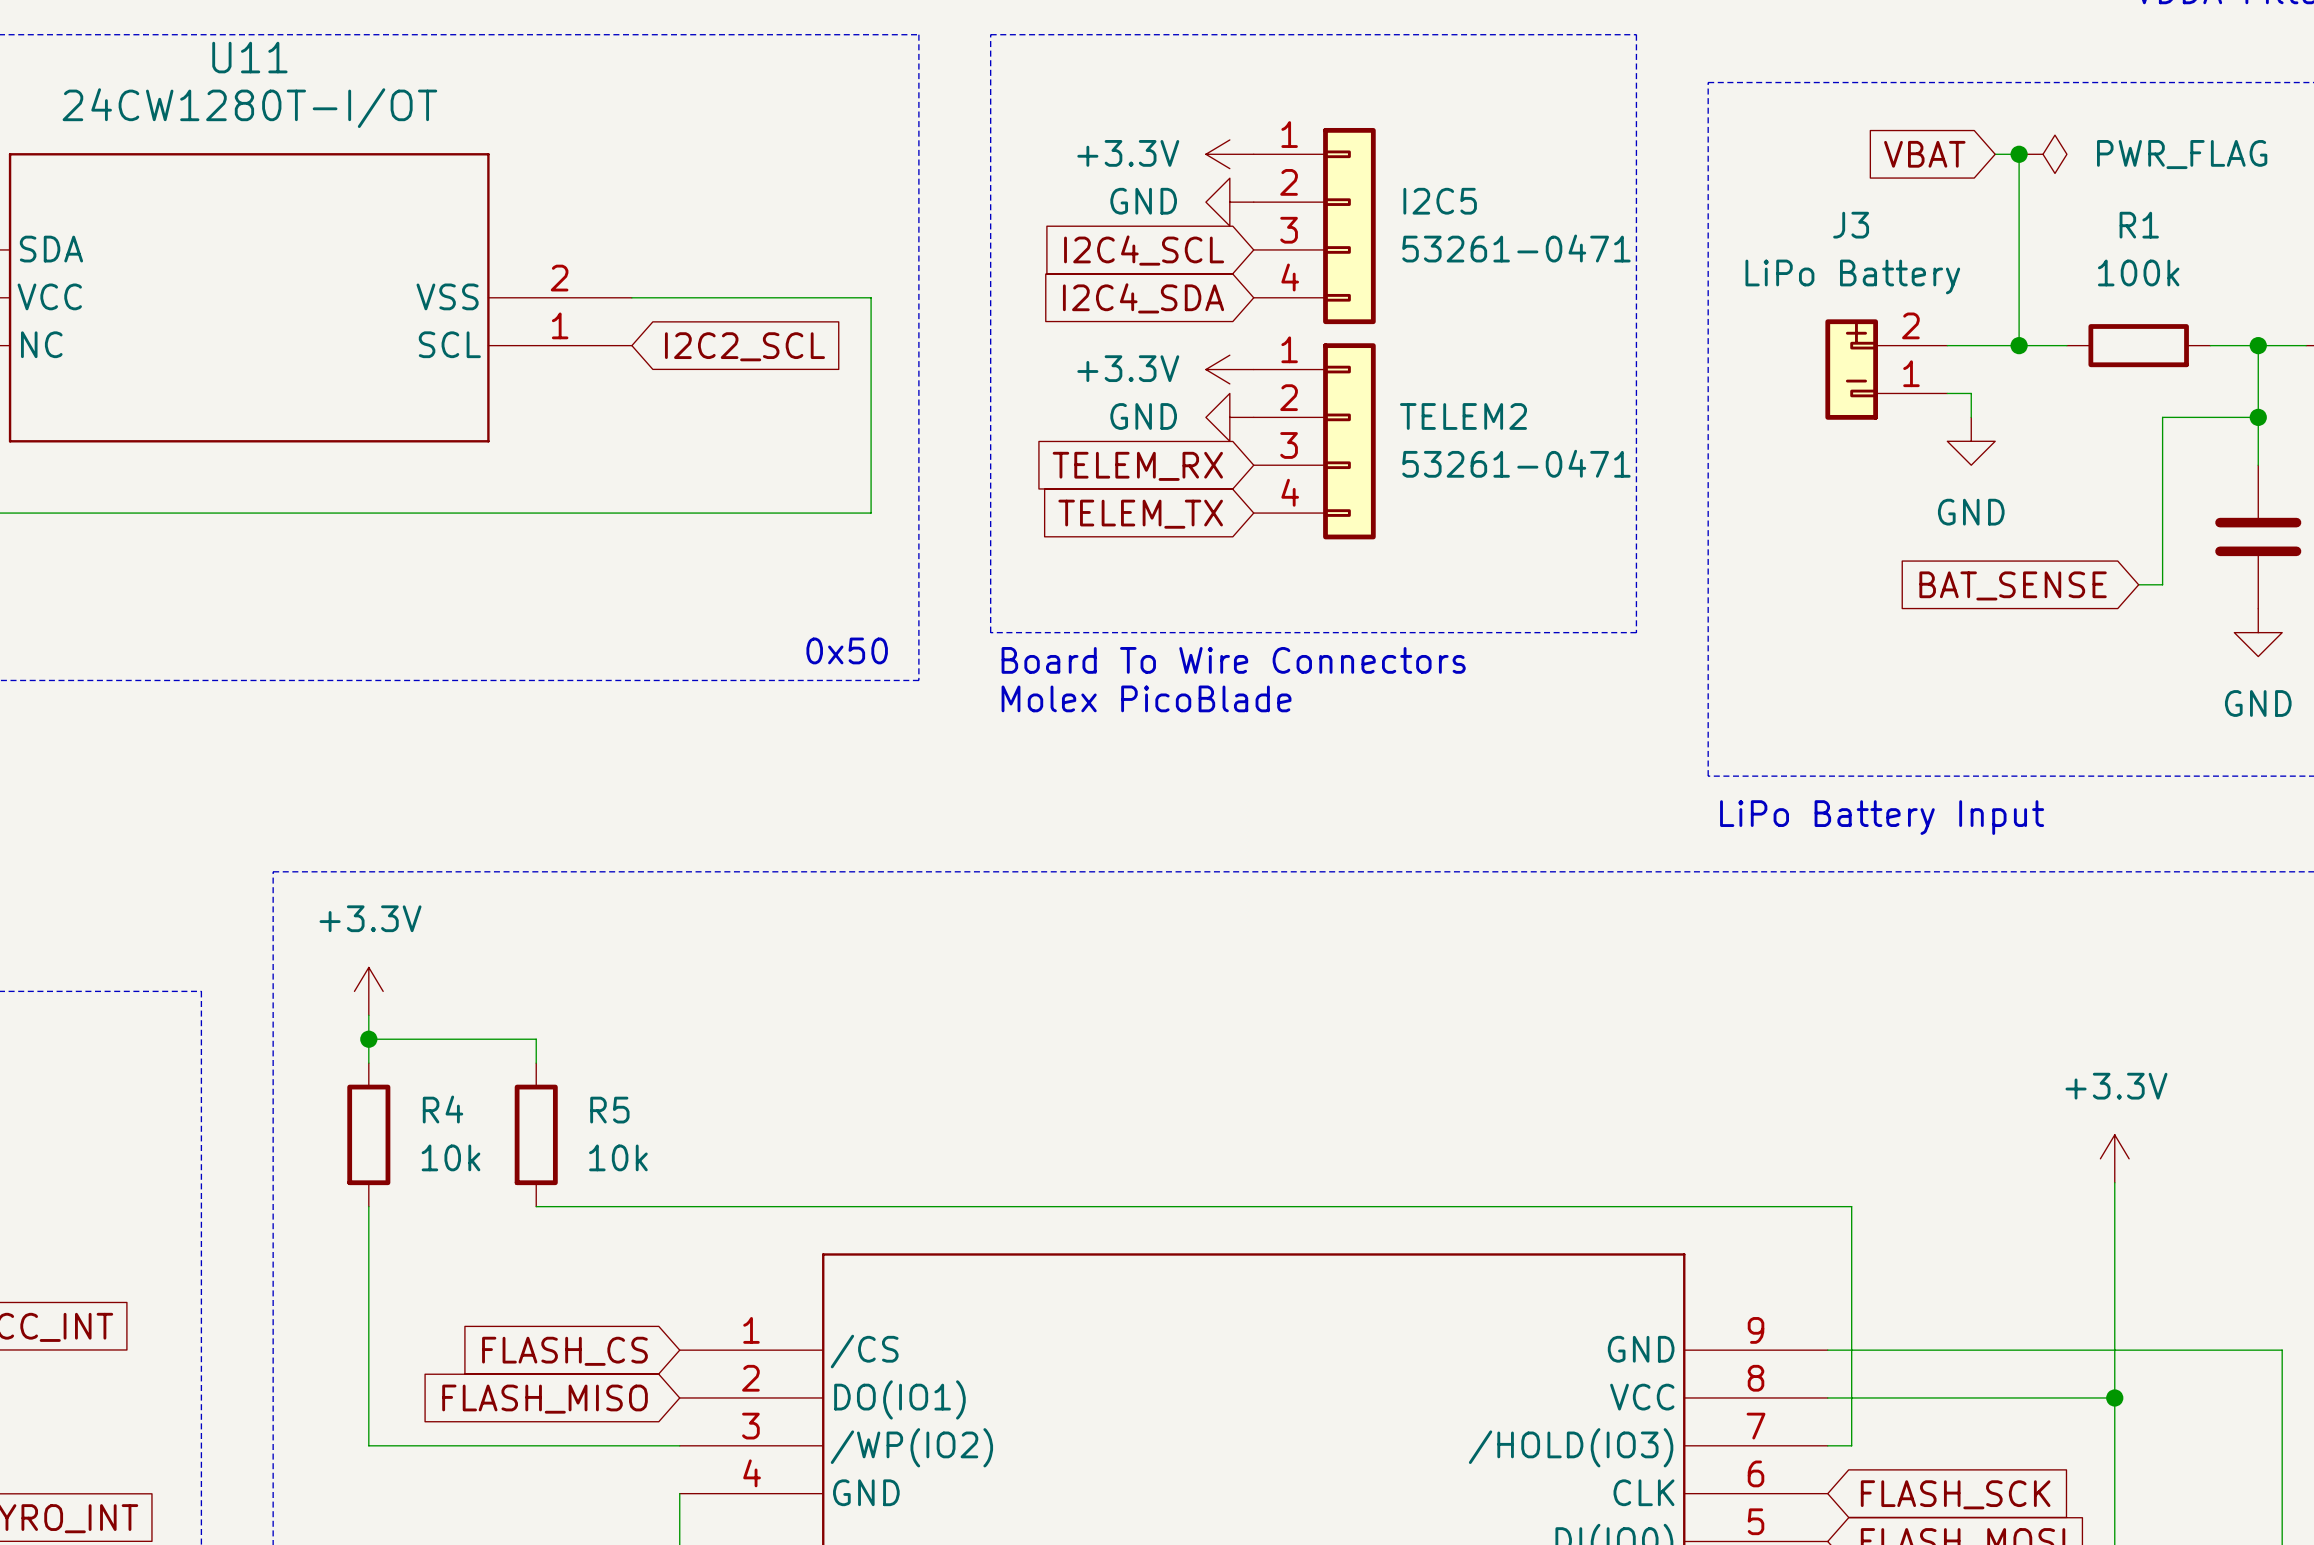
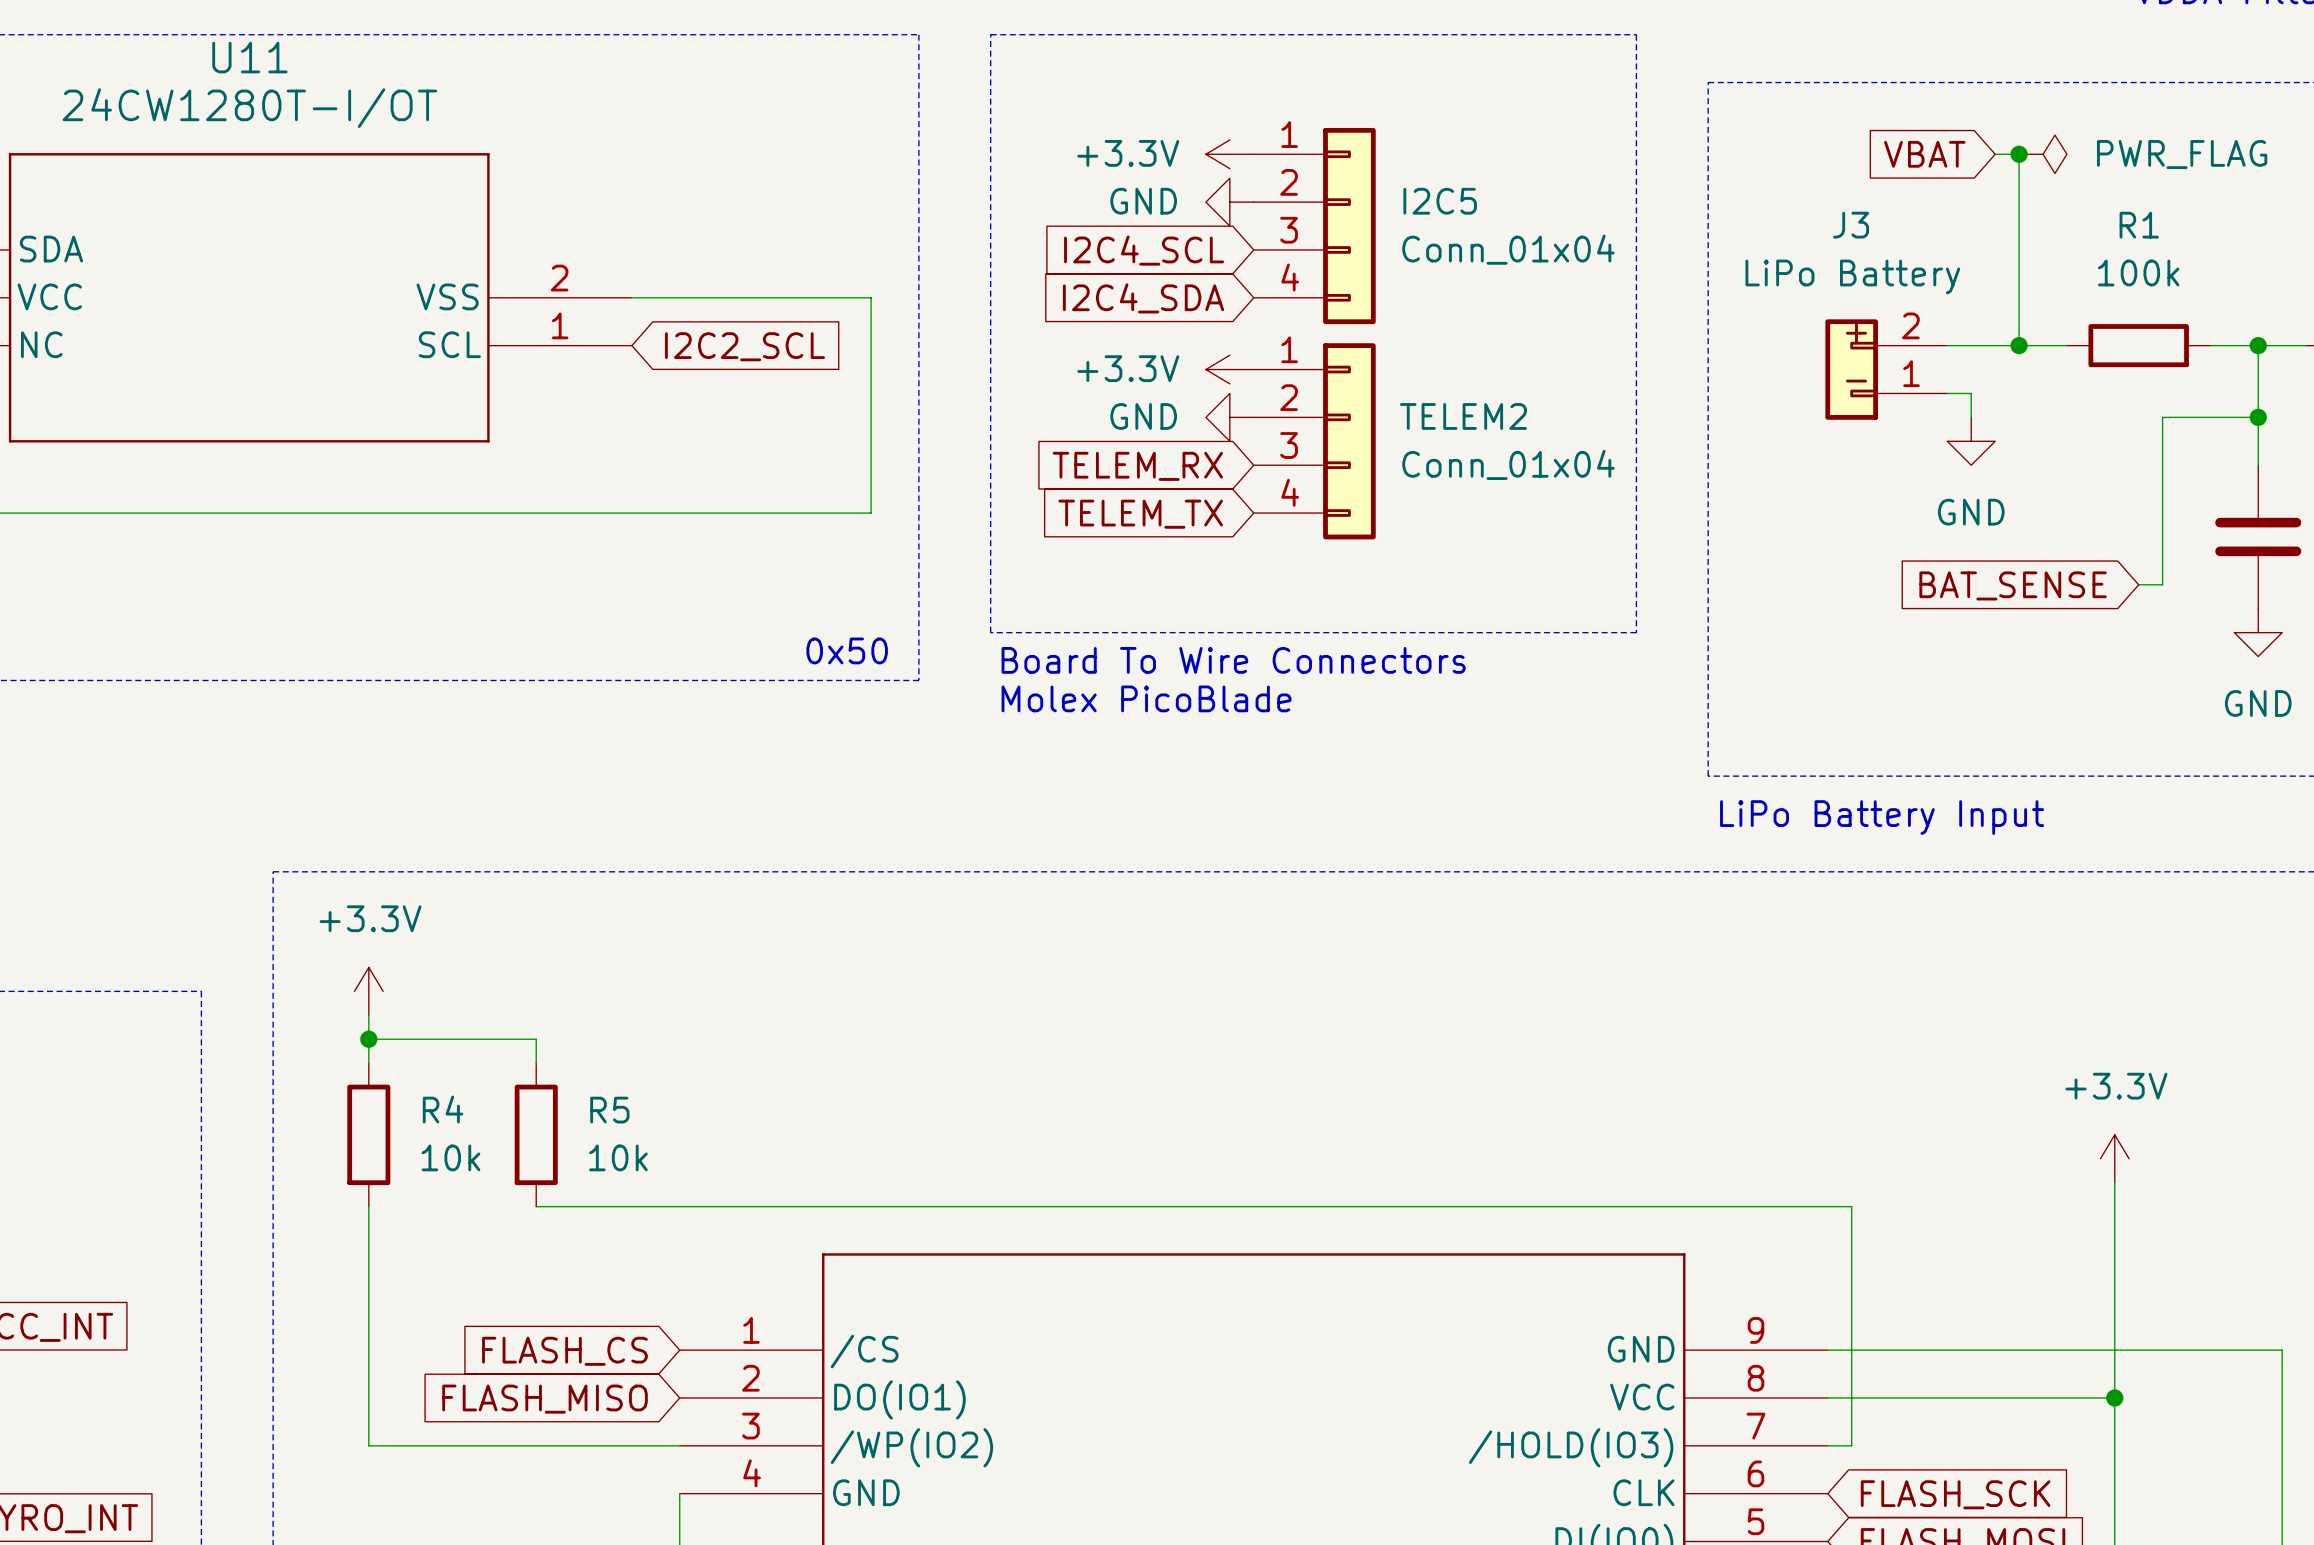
I2C5 value: 53261-0471 (1516, 248) -> Conn_01x04 (1508, 249)
TELEM2 value: 53261-0471 (1516, 463) -> Conn_01x04 (1508, 464)

